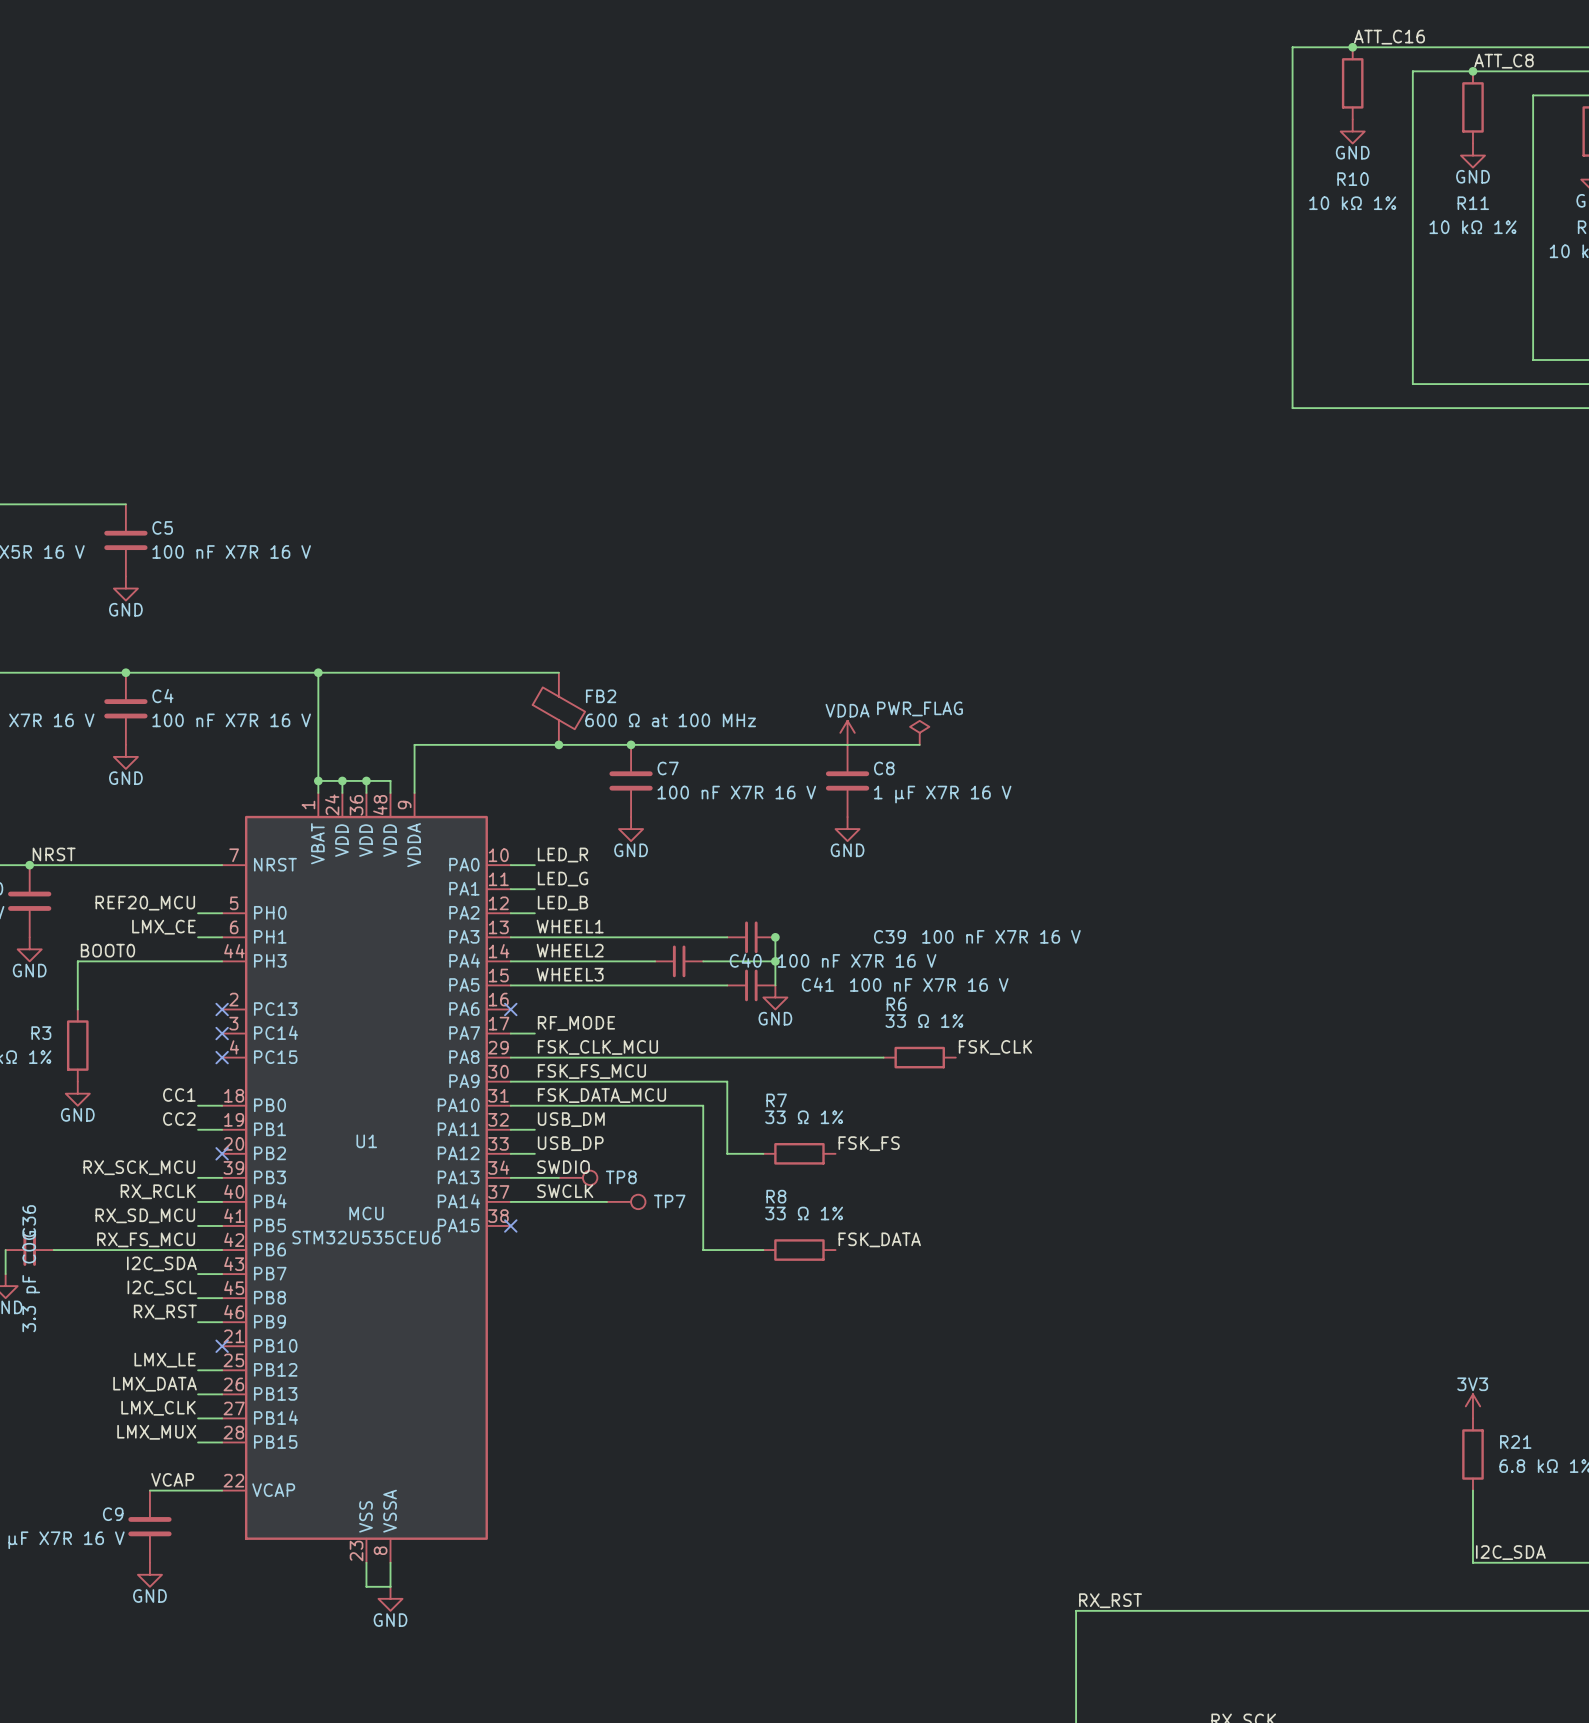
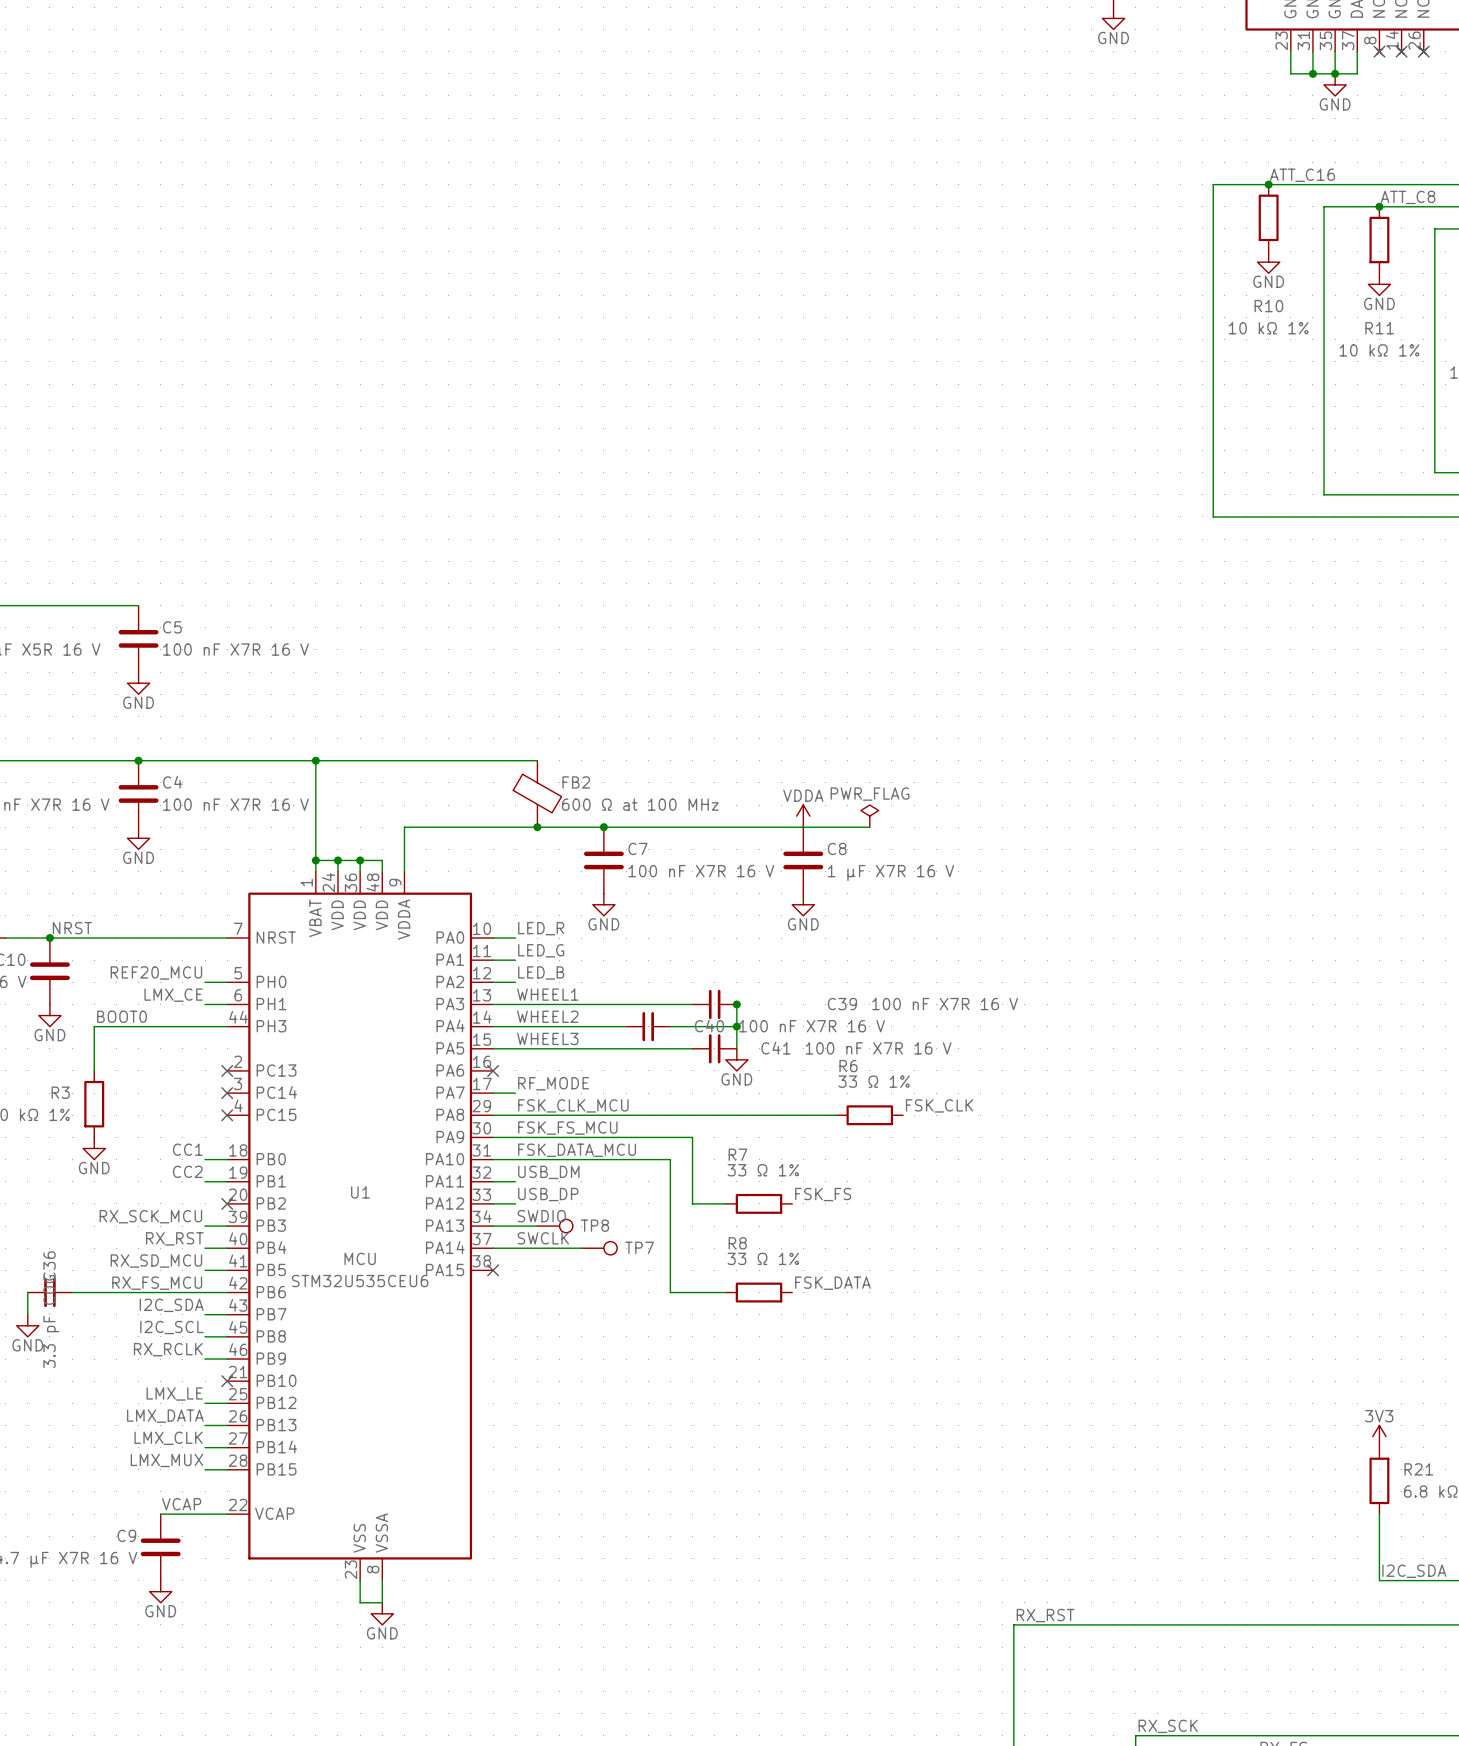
label: RX_RCLK (158, 1191) -> RX_RST (174, 1238)
label: RX_RST (165, 1312) -> RX_RCLK (168, 1349)

